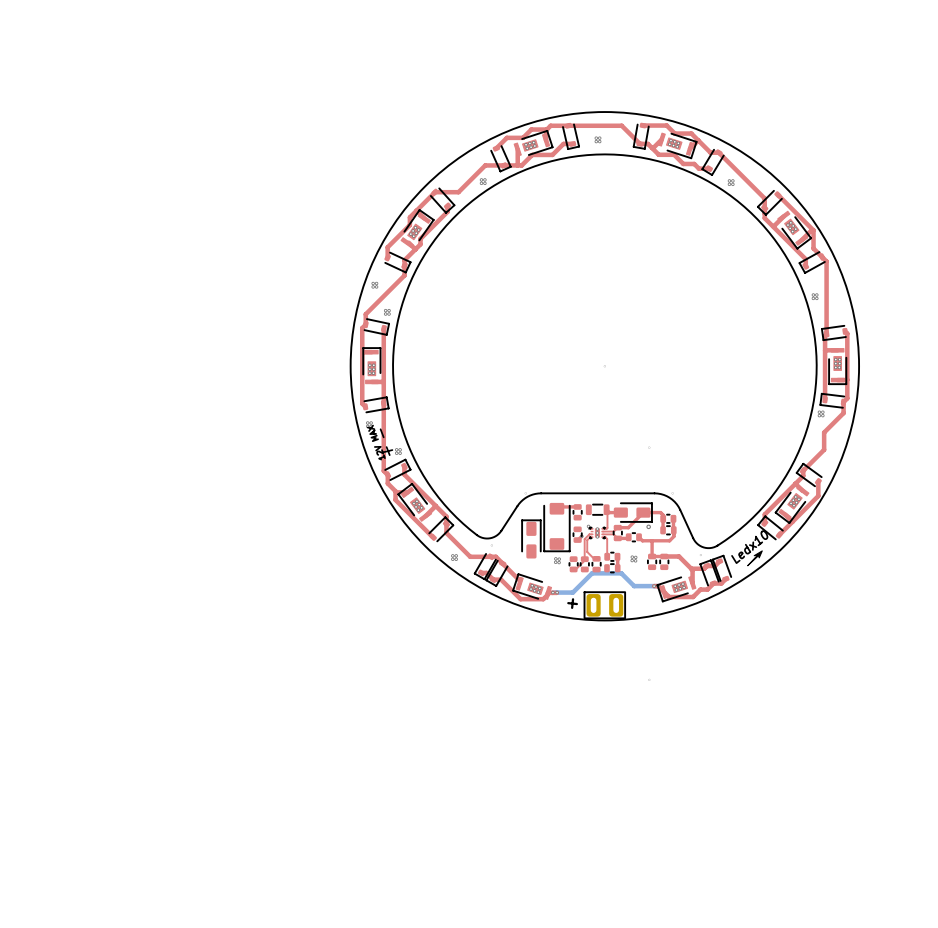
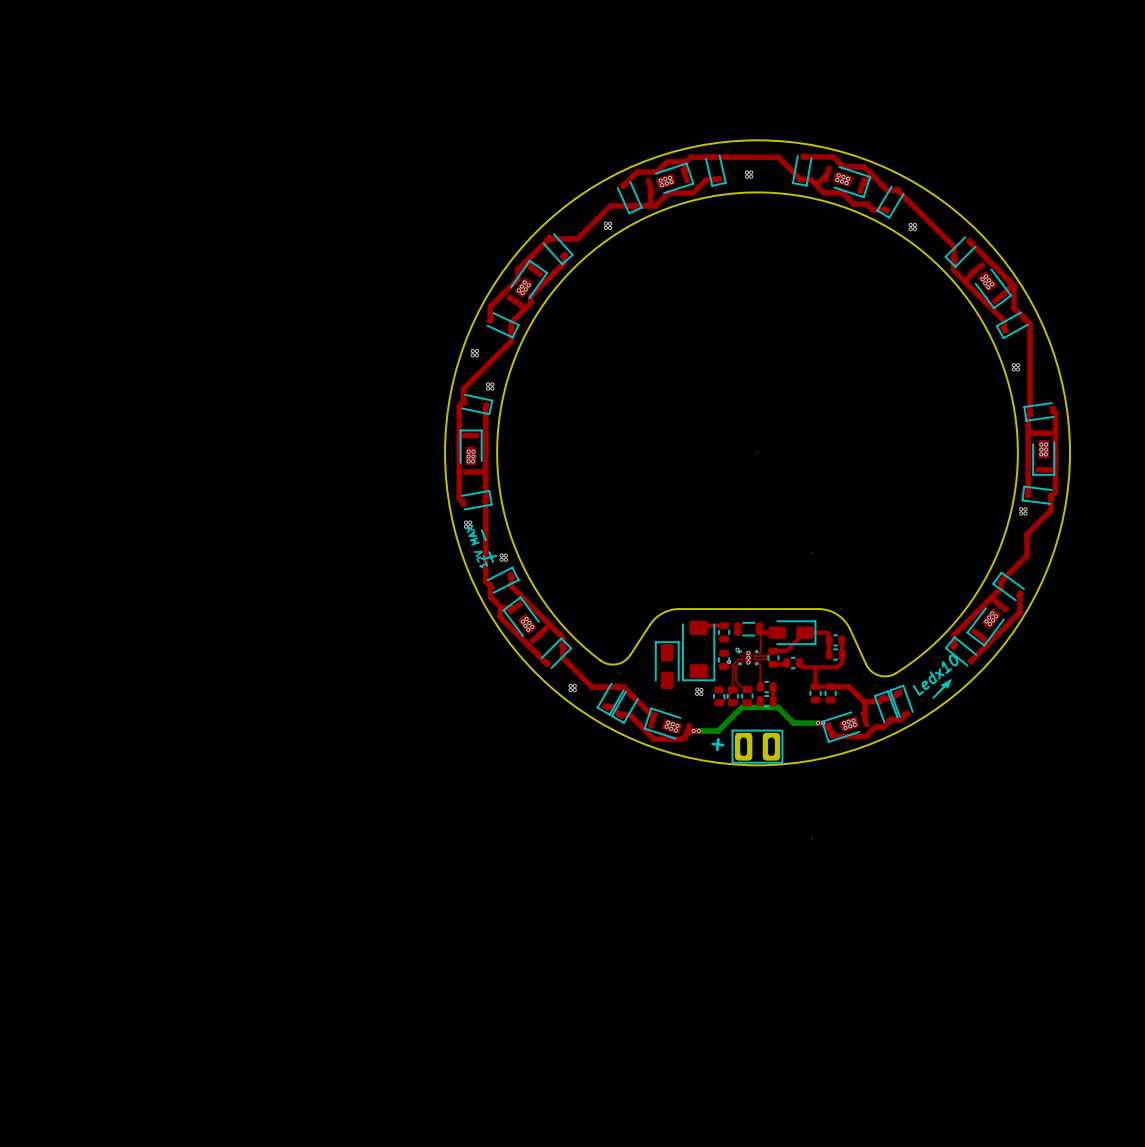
via: (648, 526) -> none
via: (632, 557) -> none
via: (635, 557) -> none
via: (632, 560) -> none
via: (635, 560) -> none

